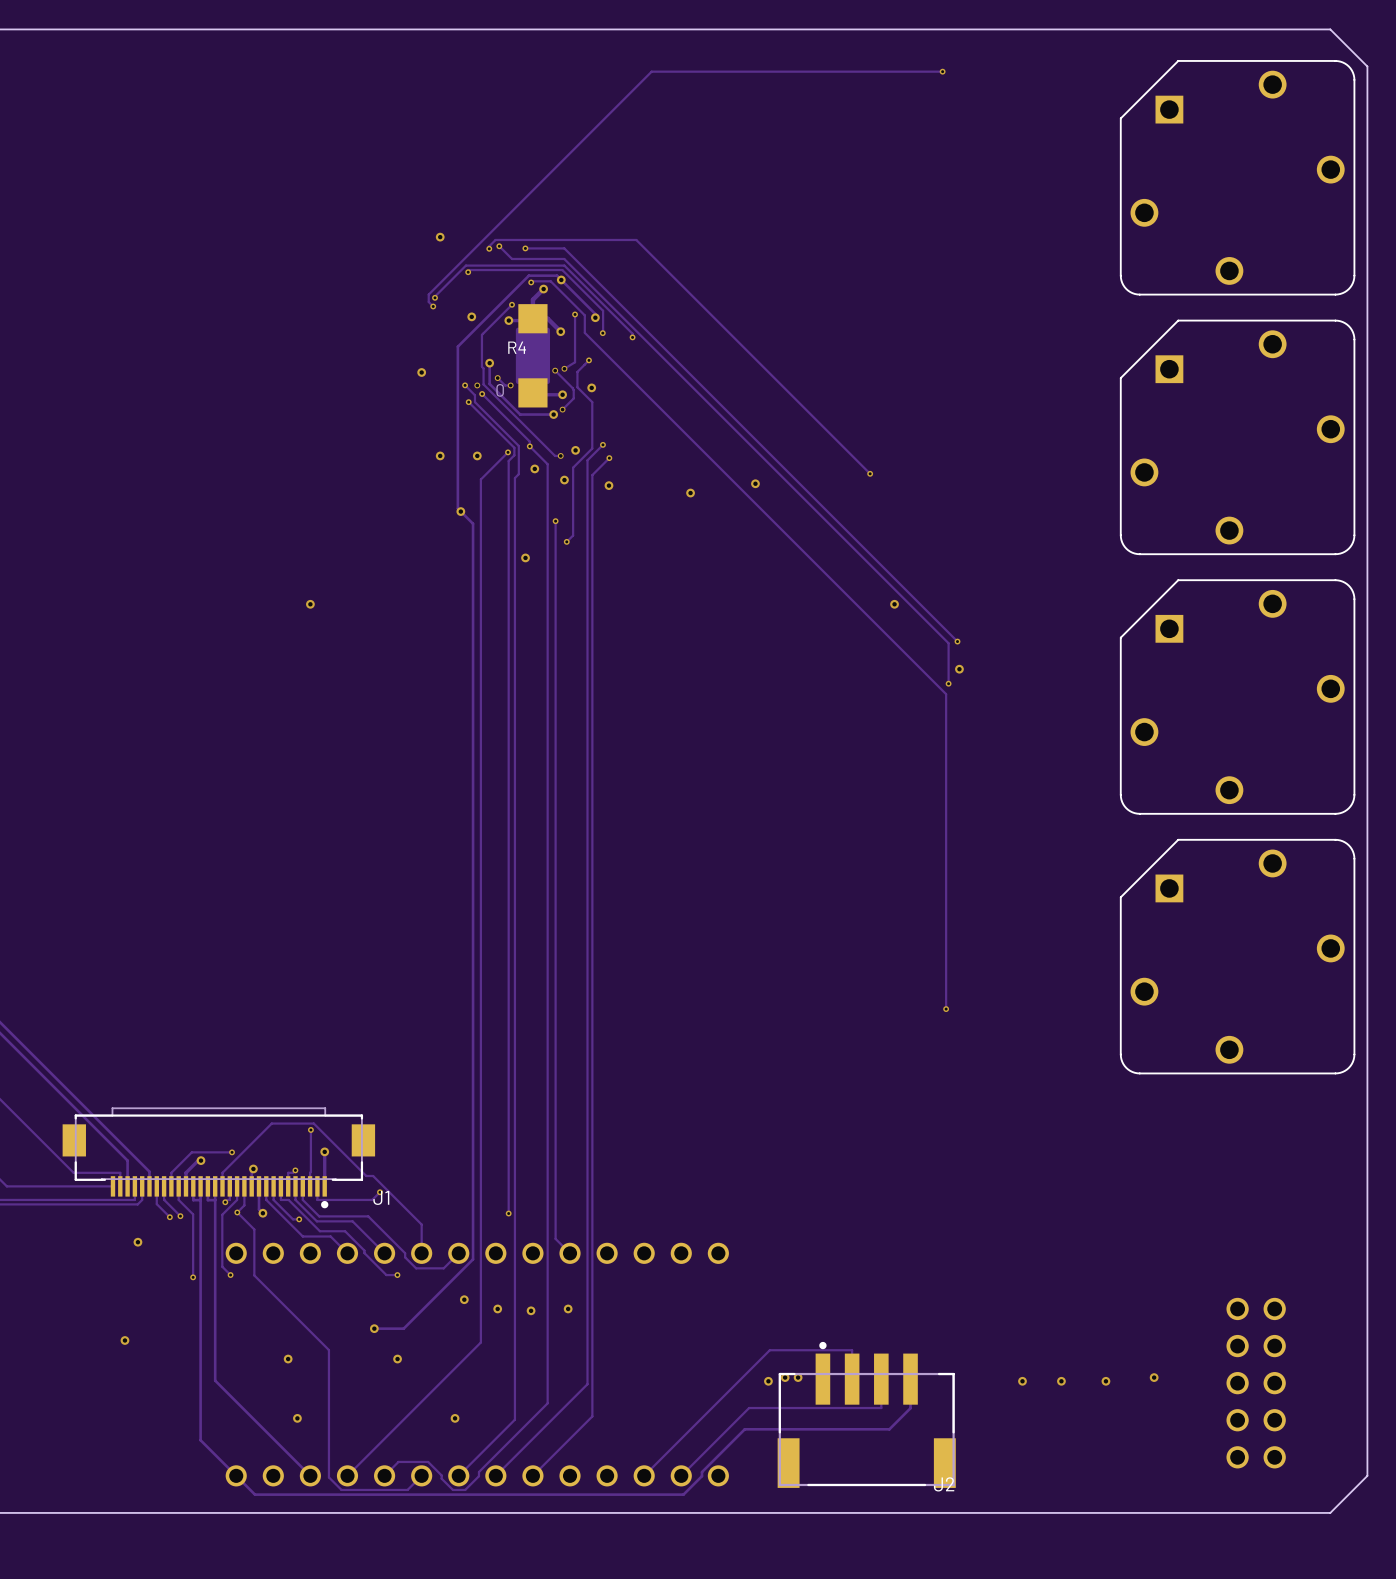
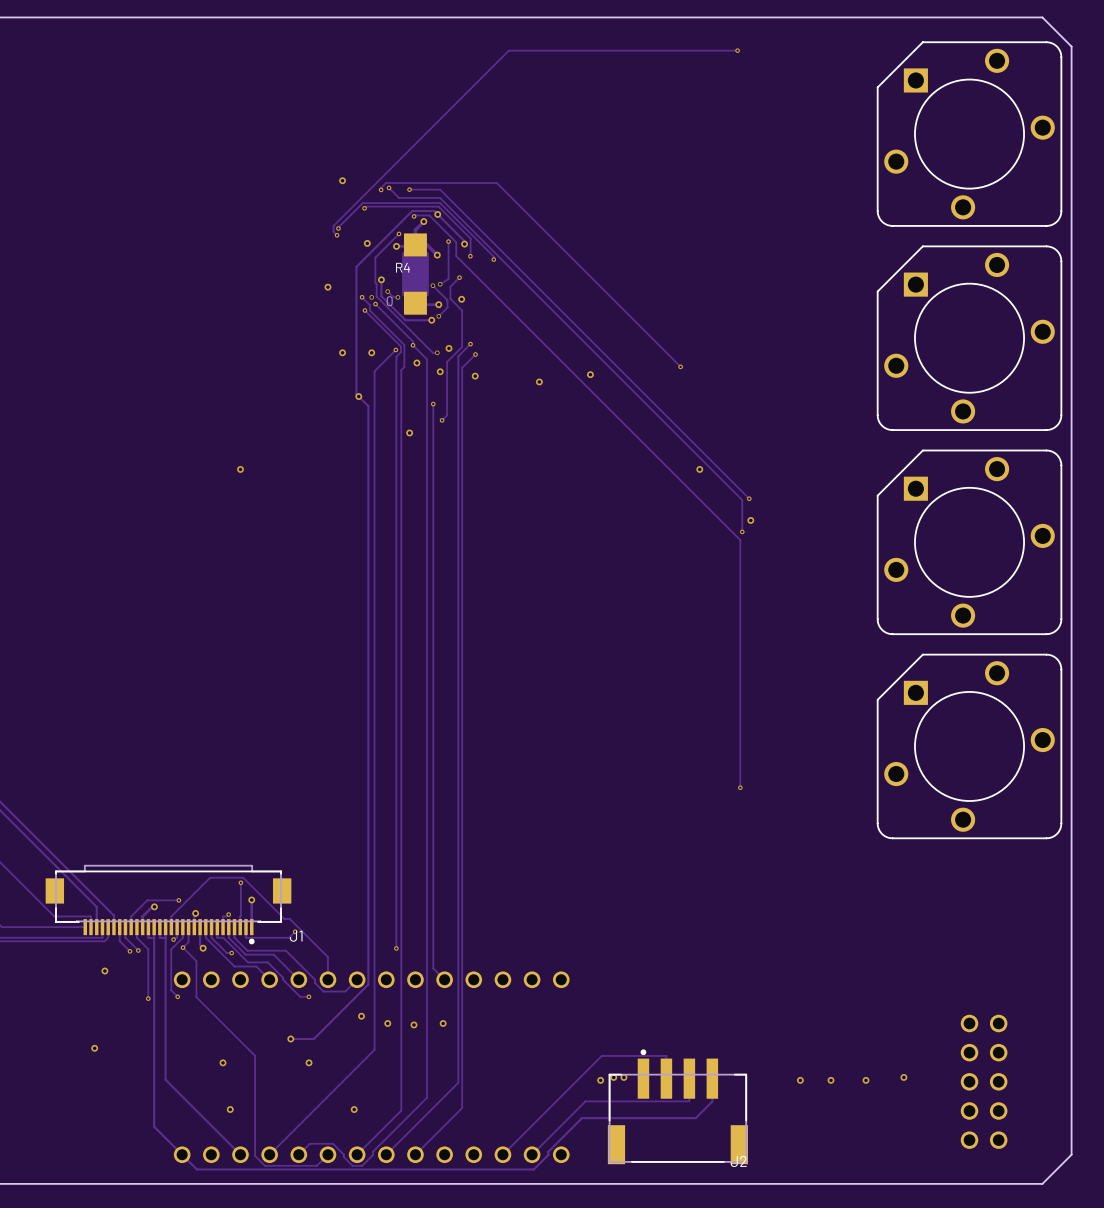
part footprint: [1119, 60, 1356, 296] -> [876, 41, 1063, 227]
part footprint: [1119, 319, 1356, 556] -> [876, 245, 1063, 431]
part footprint: [1119, 579, 1356, 815] -> [876, 449, 1063, 635]
part footprint: [1119, 838, 1356, 1075] -> [876, 653, 1063, 840]

